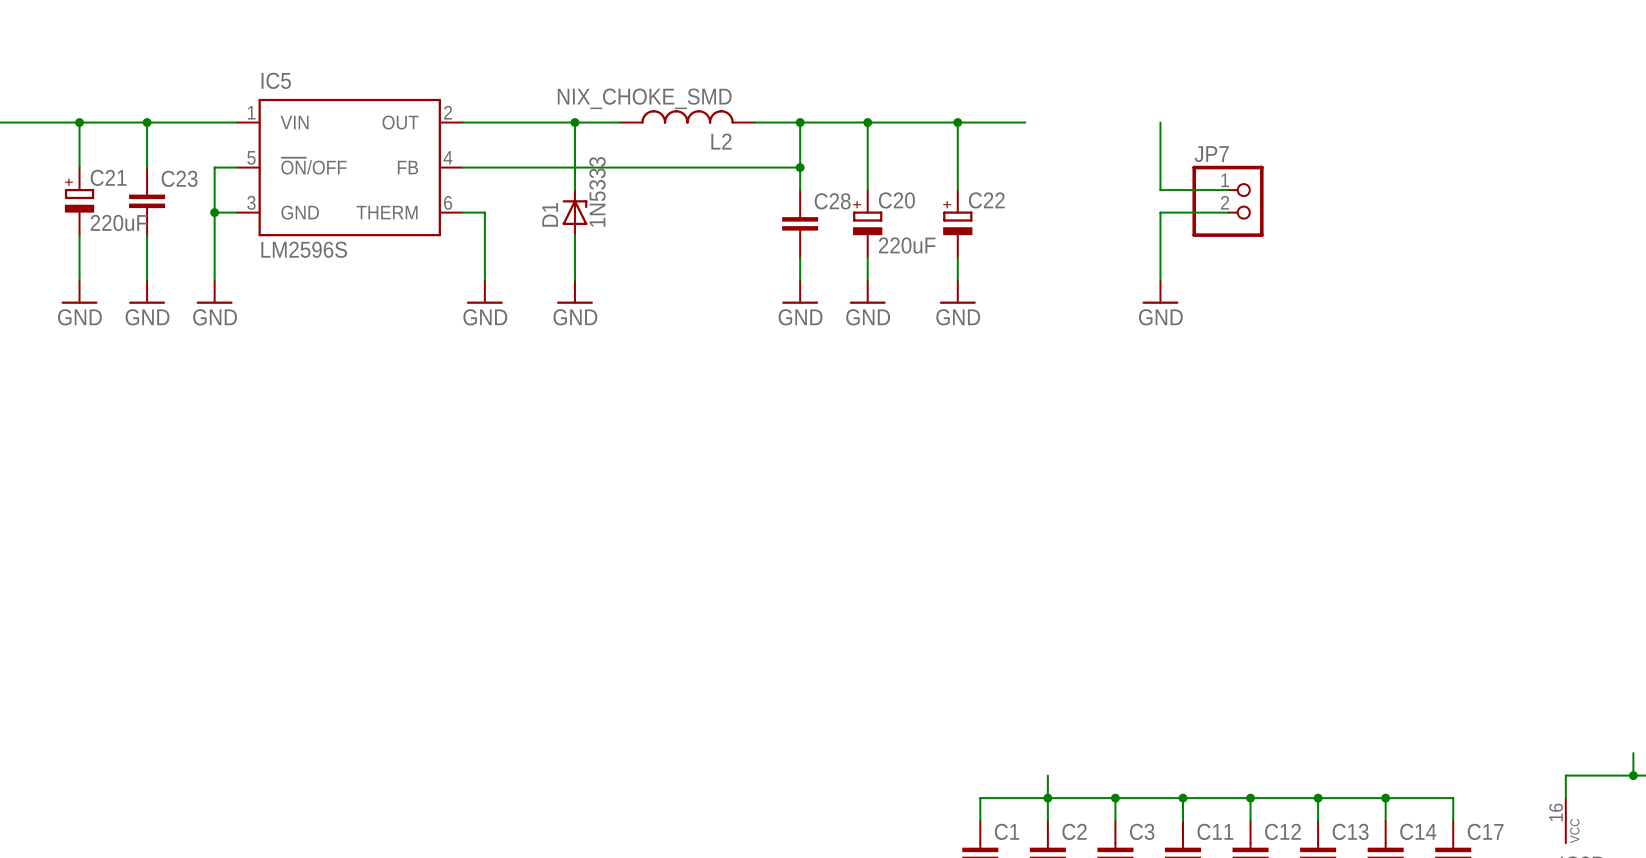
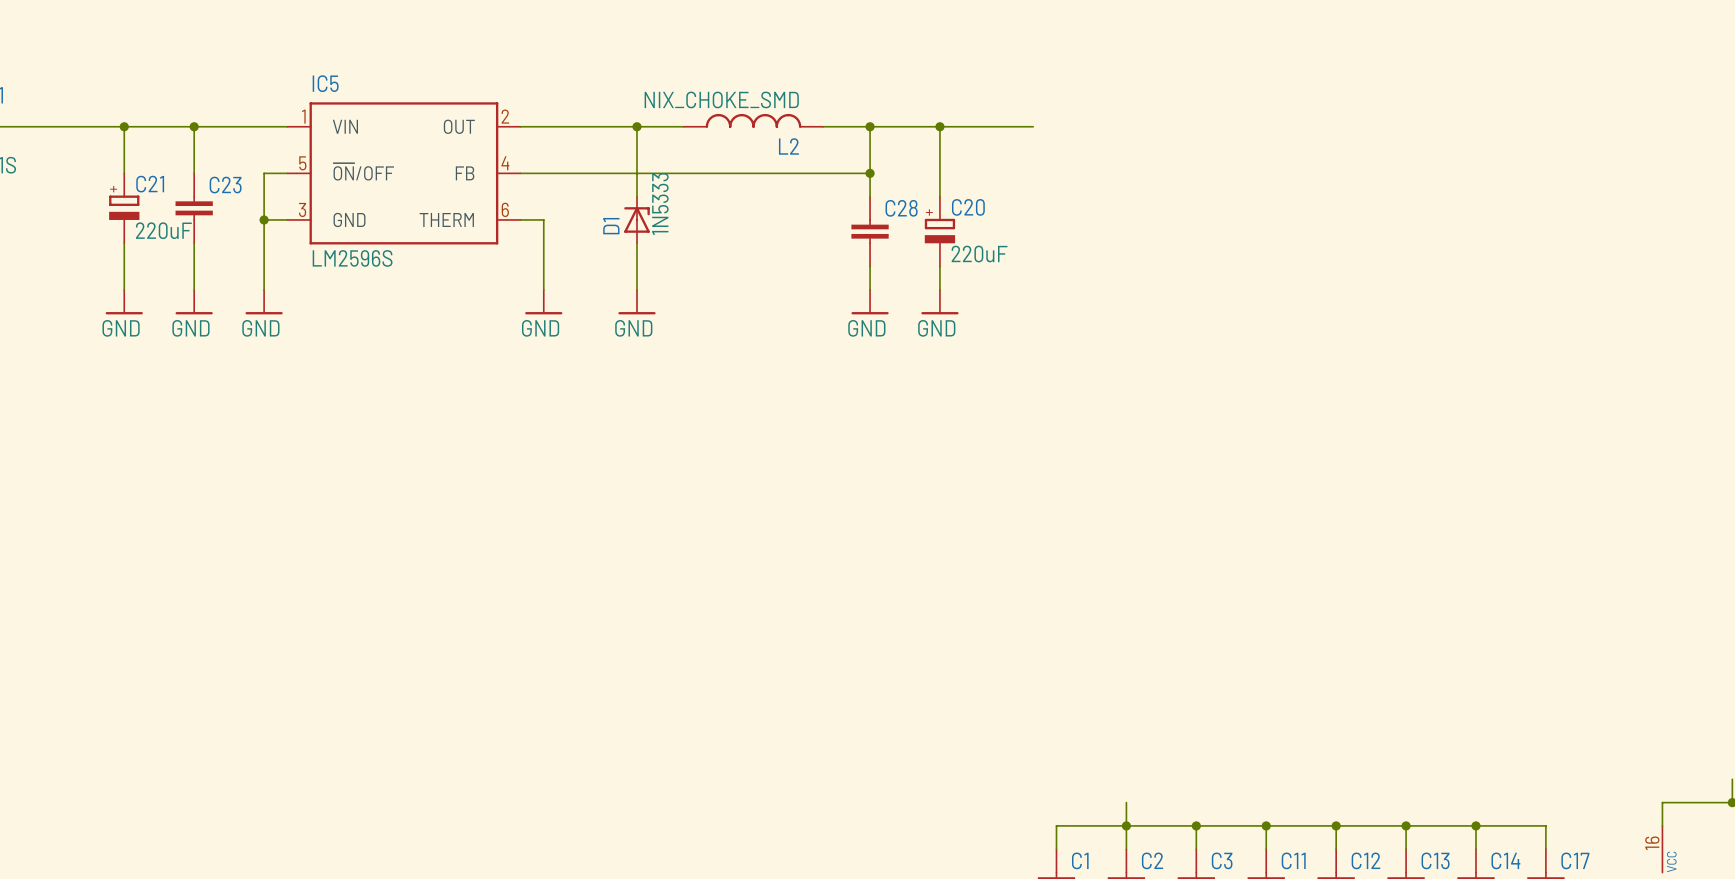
junction: (957, 122) -> none
wire: (1025, 122) (957, 122) (957, 190) -> none
wire: (1160, 122) (1160, 190) (1228, 190) -> none
JP7: (1228, 201) -> none
wire: (1228, 212) (1160, 212) (1160, 280) -> none
C22: (957, 223) -> none
wire: (957, 257) (957, 280) -> none
power symbol: GND (957, 291) -> none
power symbol: GND (1160, 291) -> none

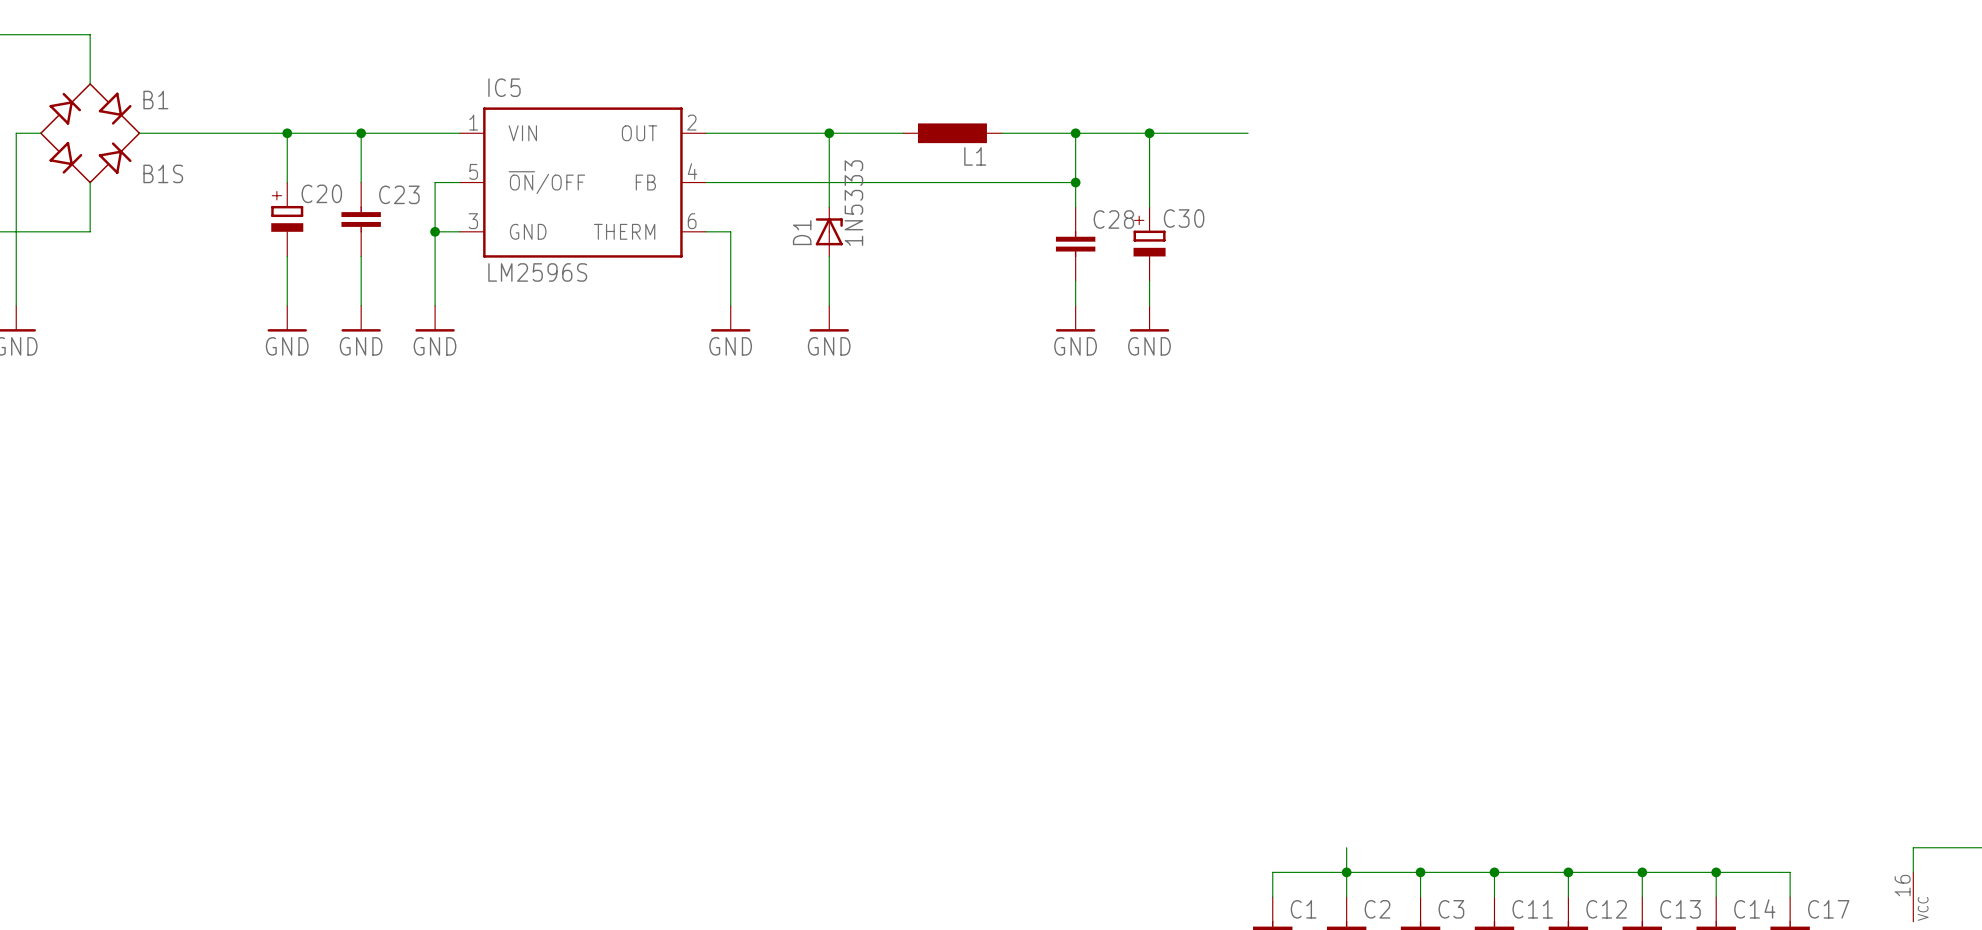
L2: NIX_CHOKE_SMD (753, 120) -> none
L1: none -> (952, 133)
C21 name: C21 (150, 184) -> C20 (321, 193)
C20 name: C20 (968, 207) -> C30 (1184, 218)
C21 value: 220uF (163, 230) -> none
C20 value: 220uF (979, 254) -> none

